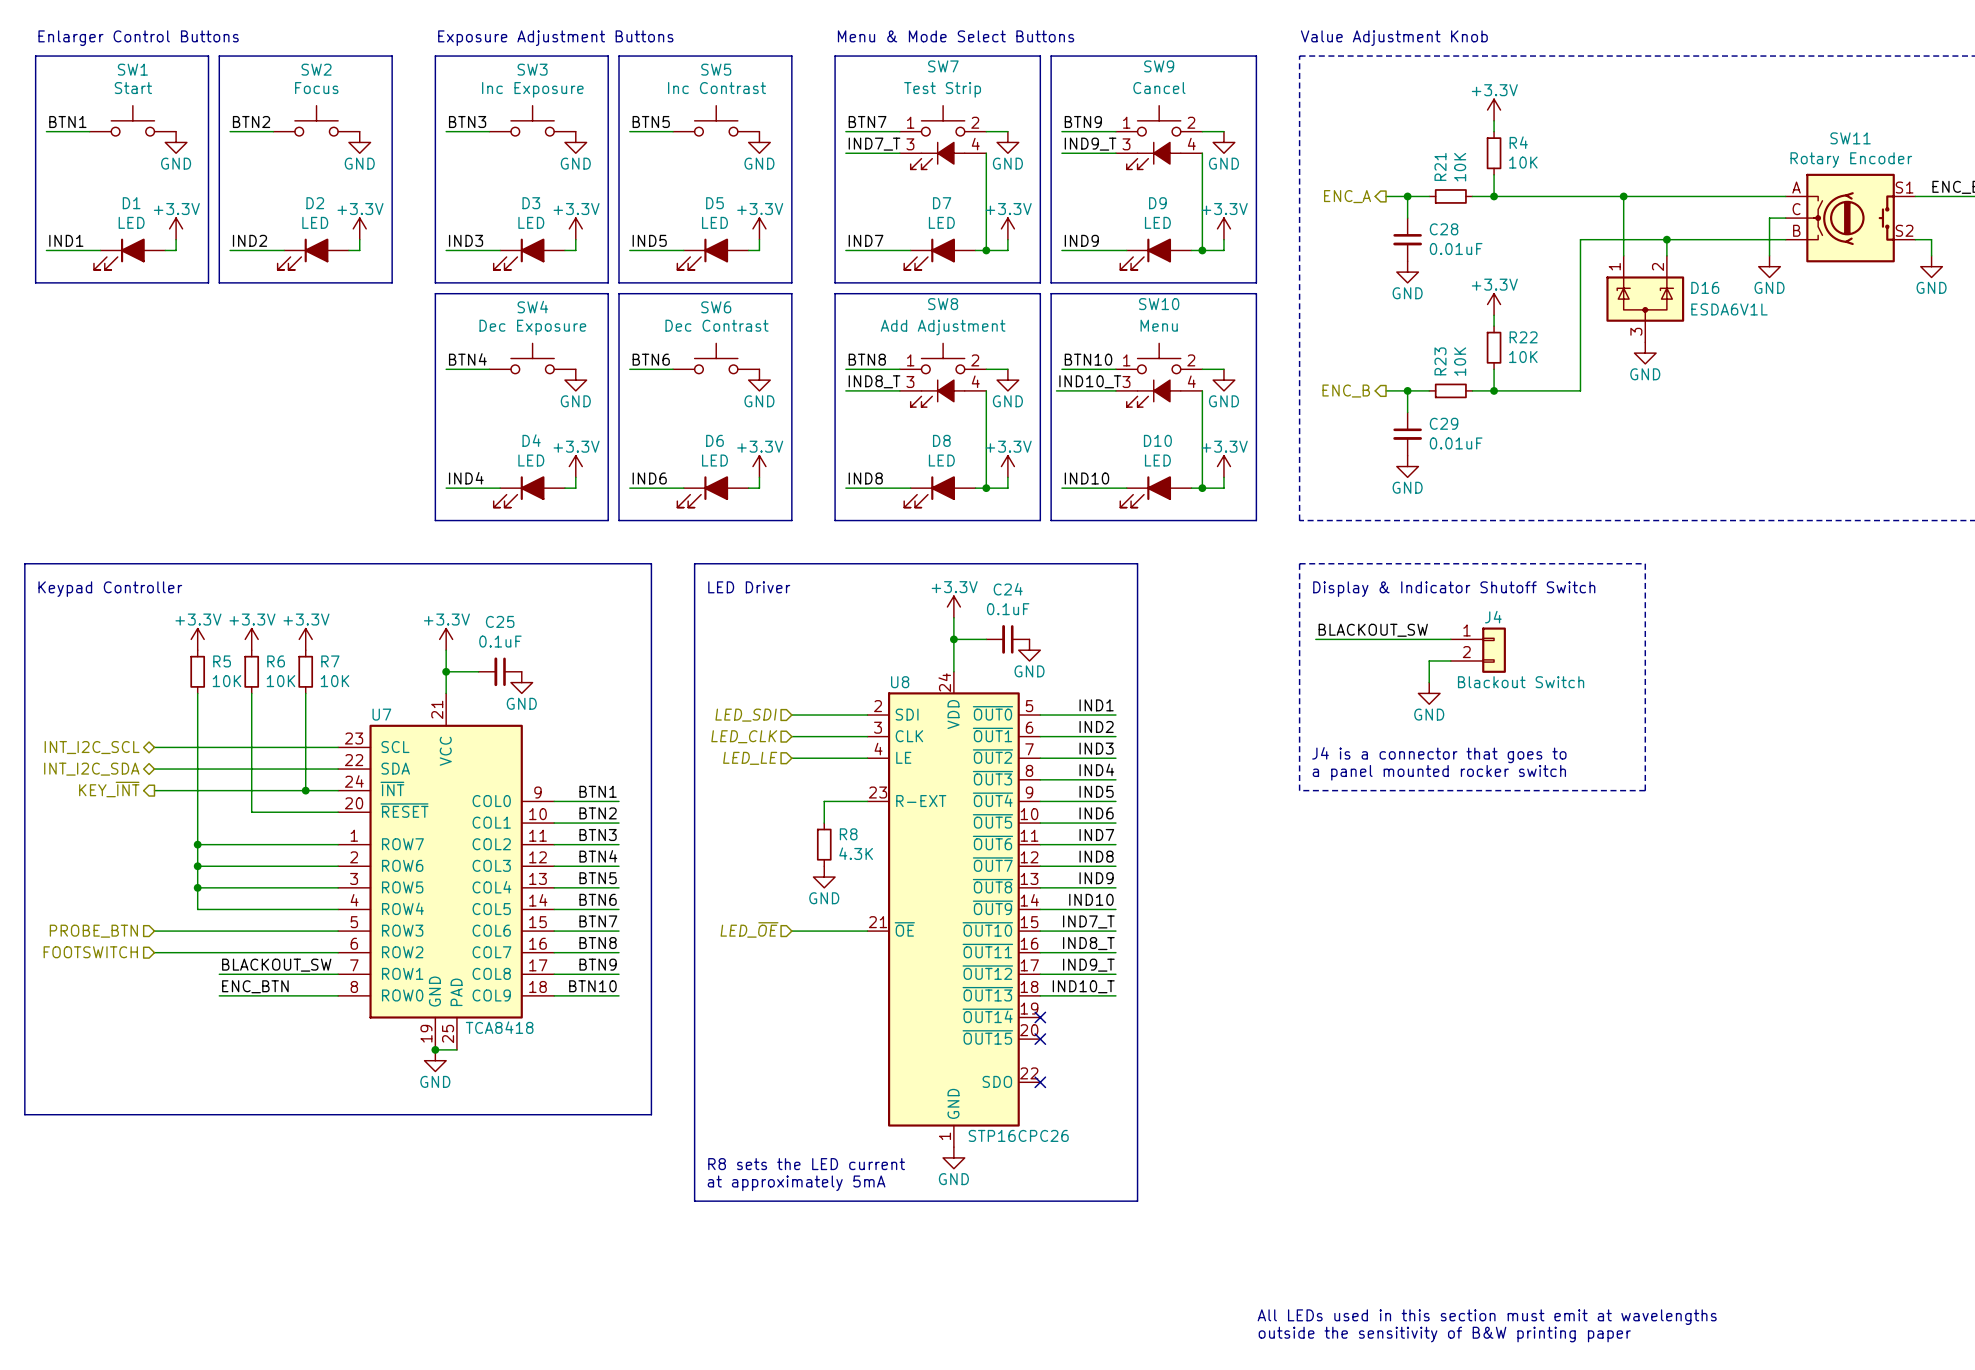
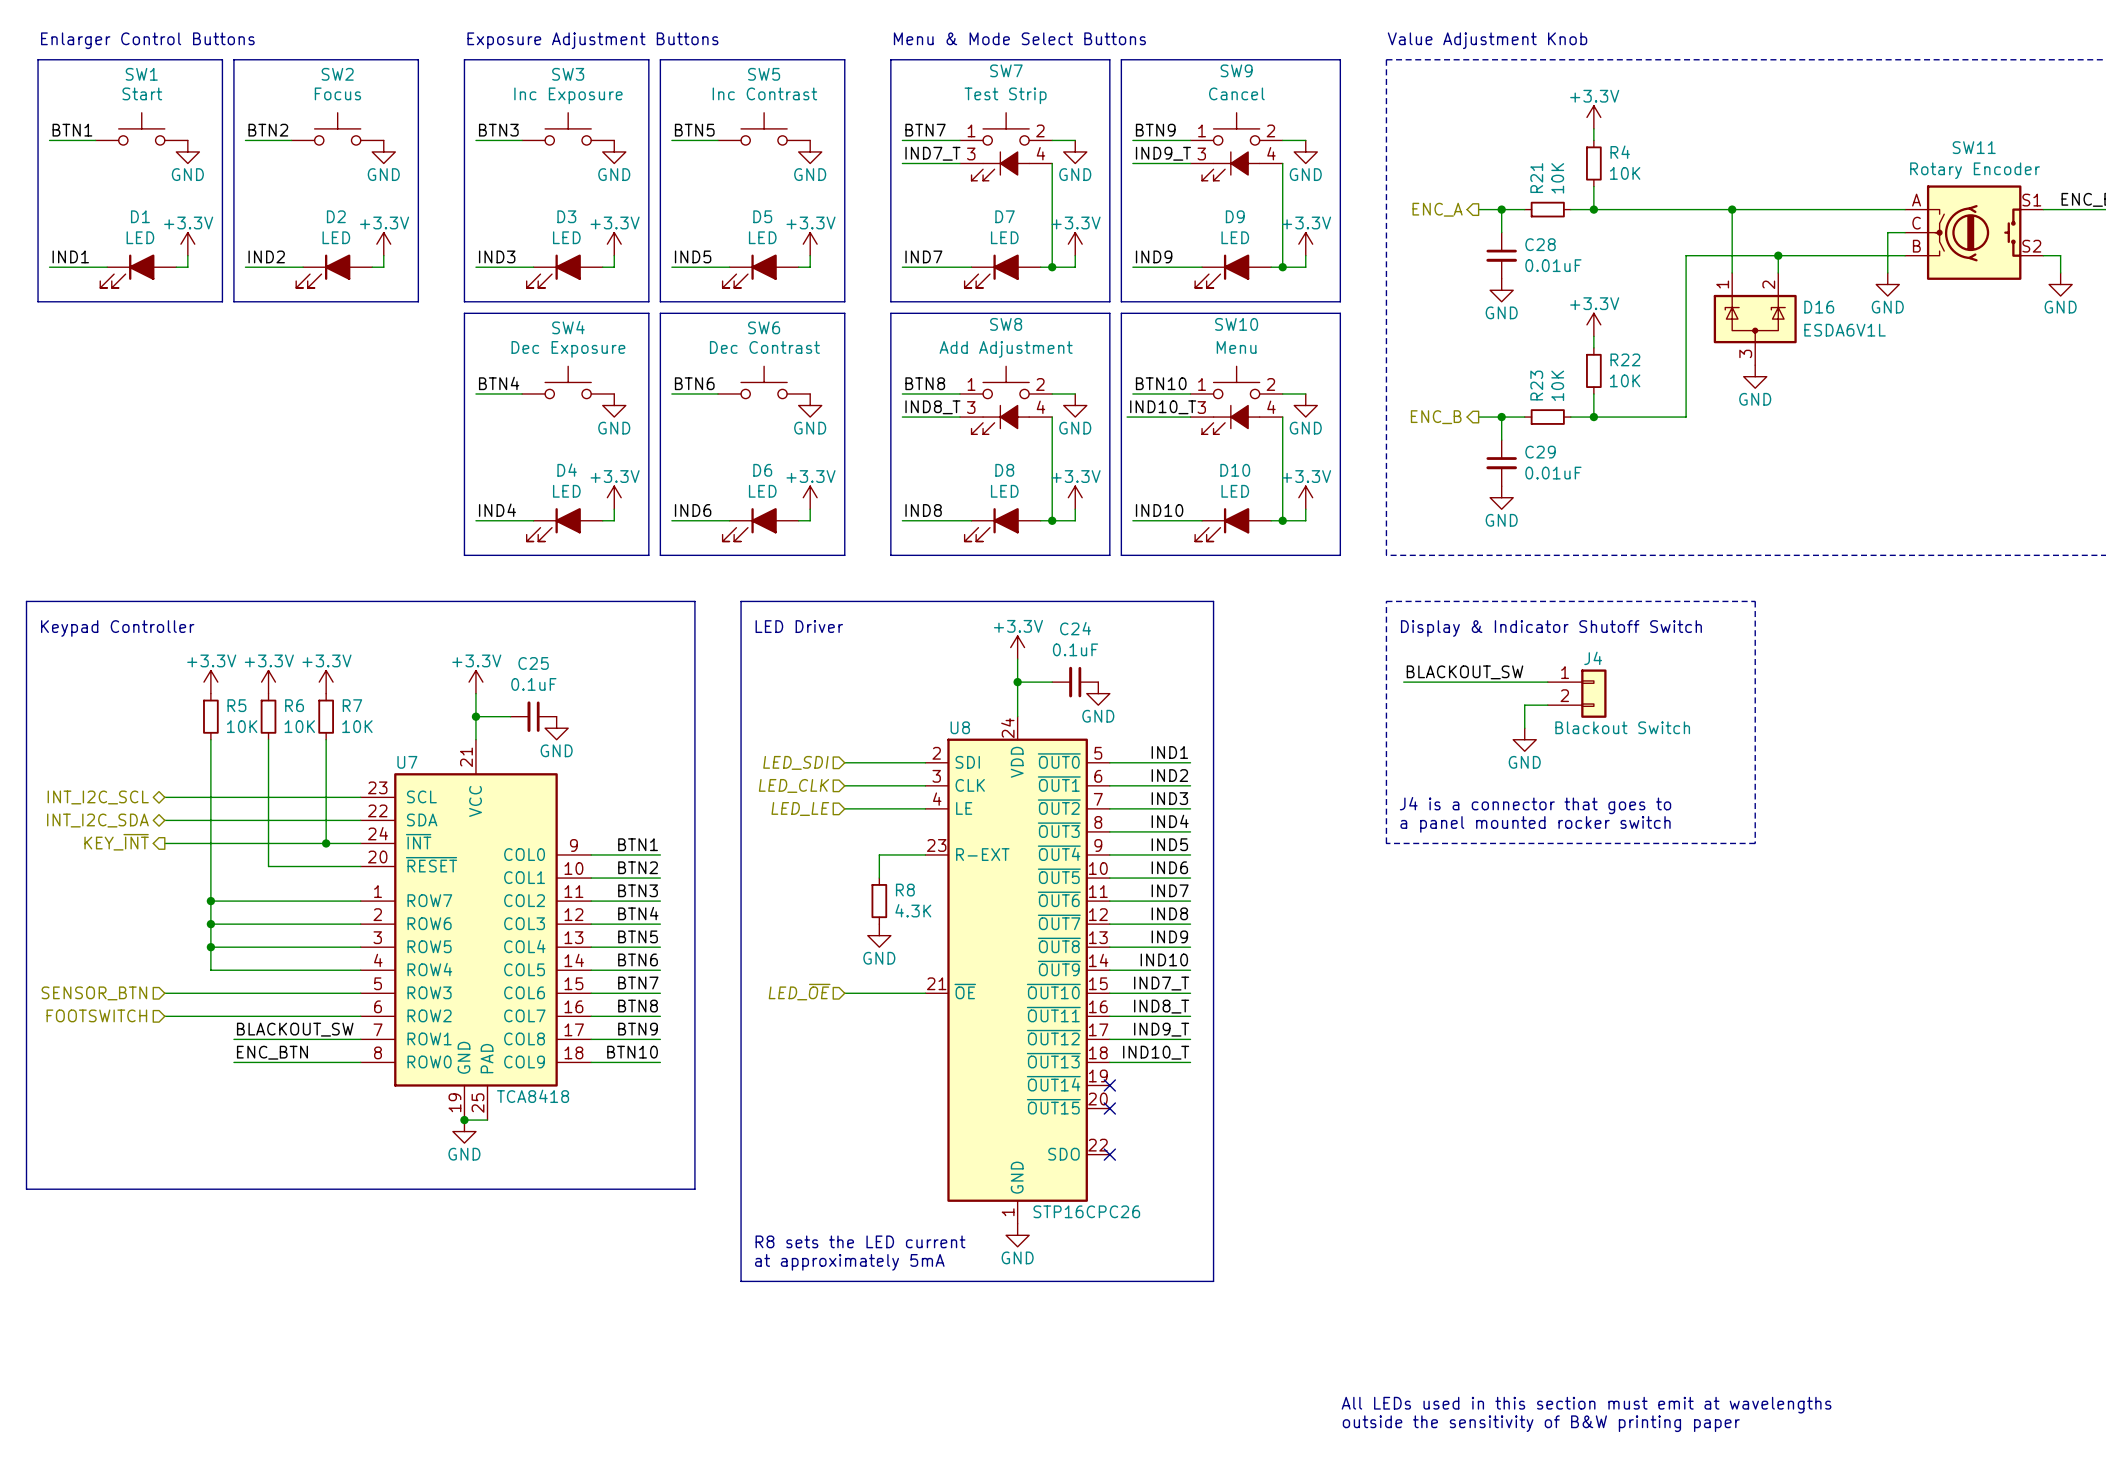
hierarchical label: PROBE_BTN (93, 931) -> SENSOR_BTN (94, 993)

